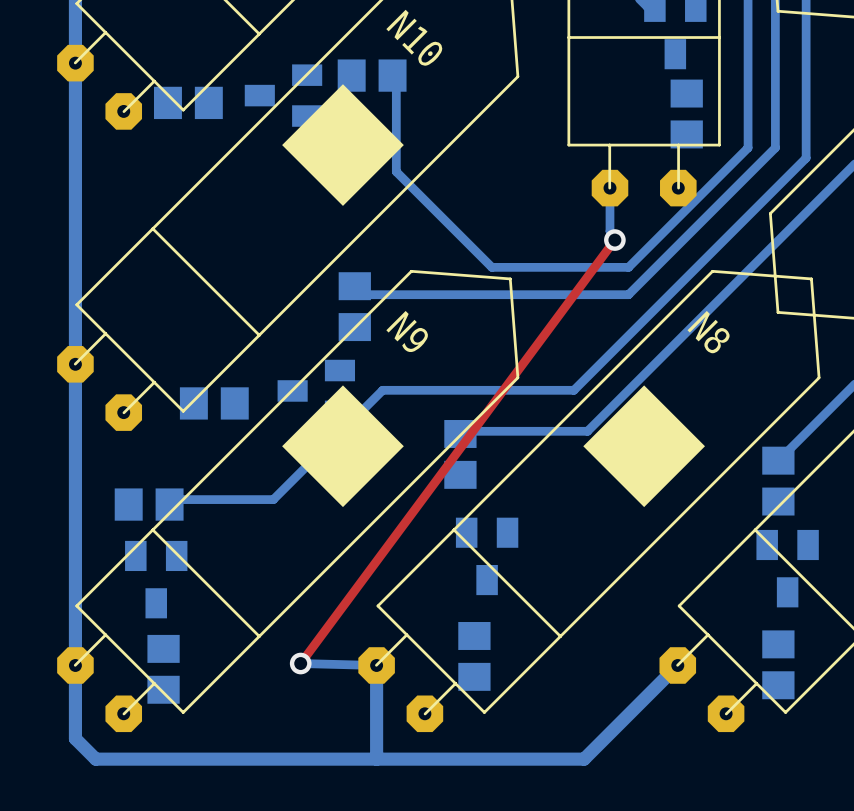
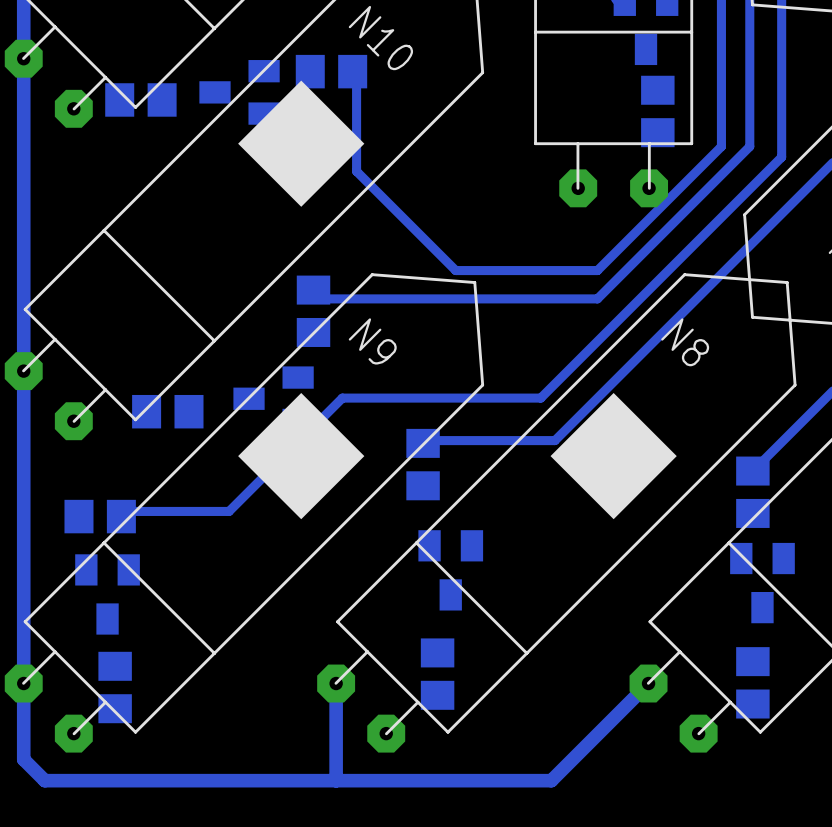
bottom track: (609, 188) (609, 231) (614, 240) -> none
top track: (614, 240) (300, 663) -> none
via: (614, 240) -> none
bottom track: (300, 663) (376, 665) -> none
via: (300, 663) -> none

